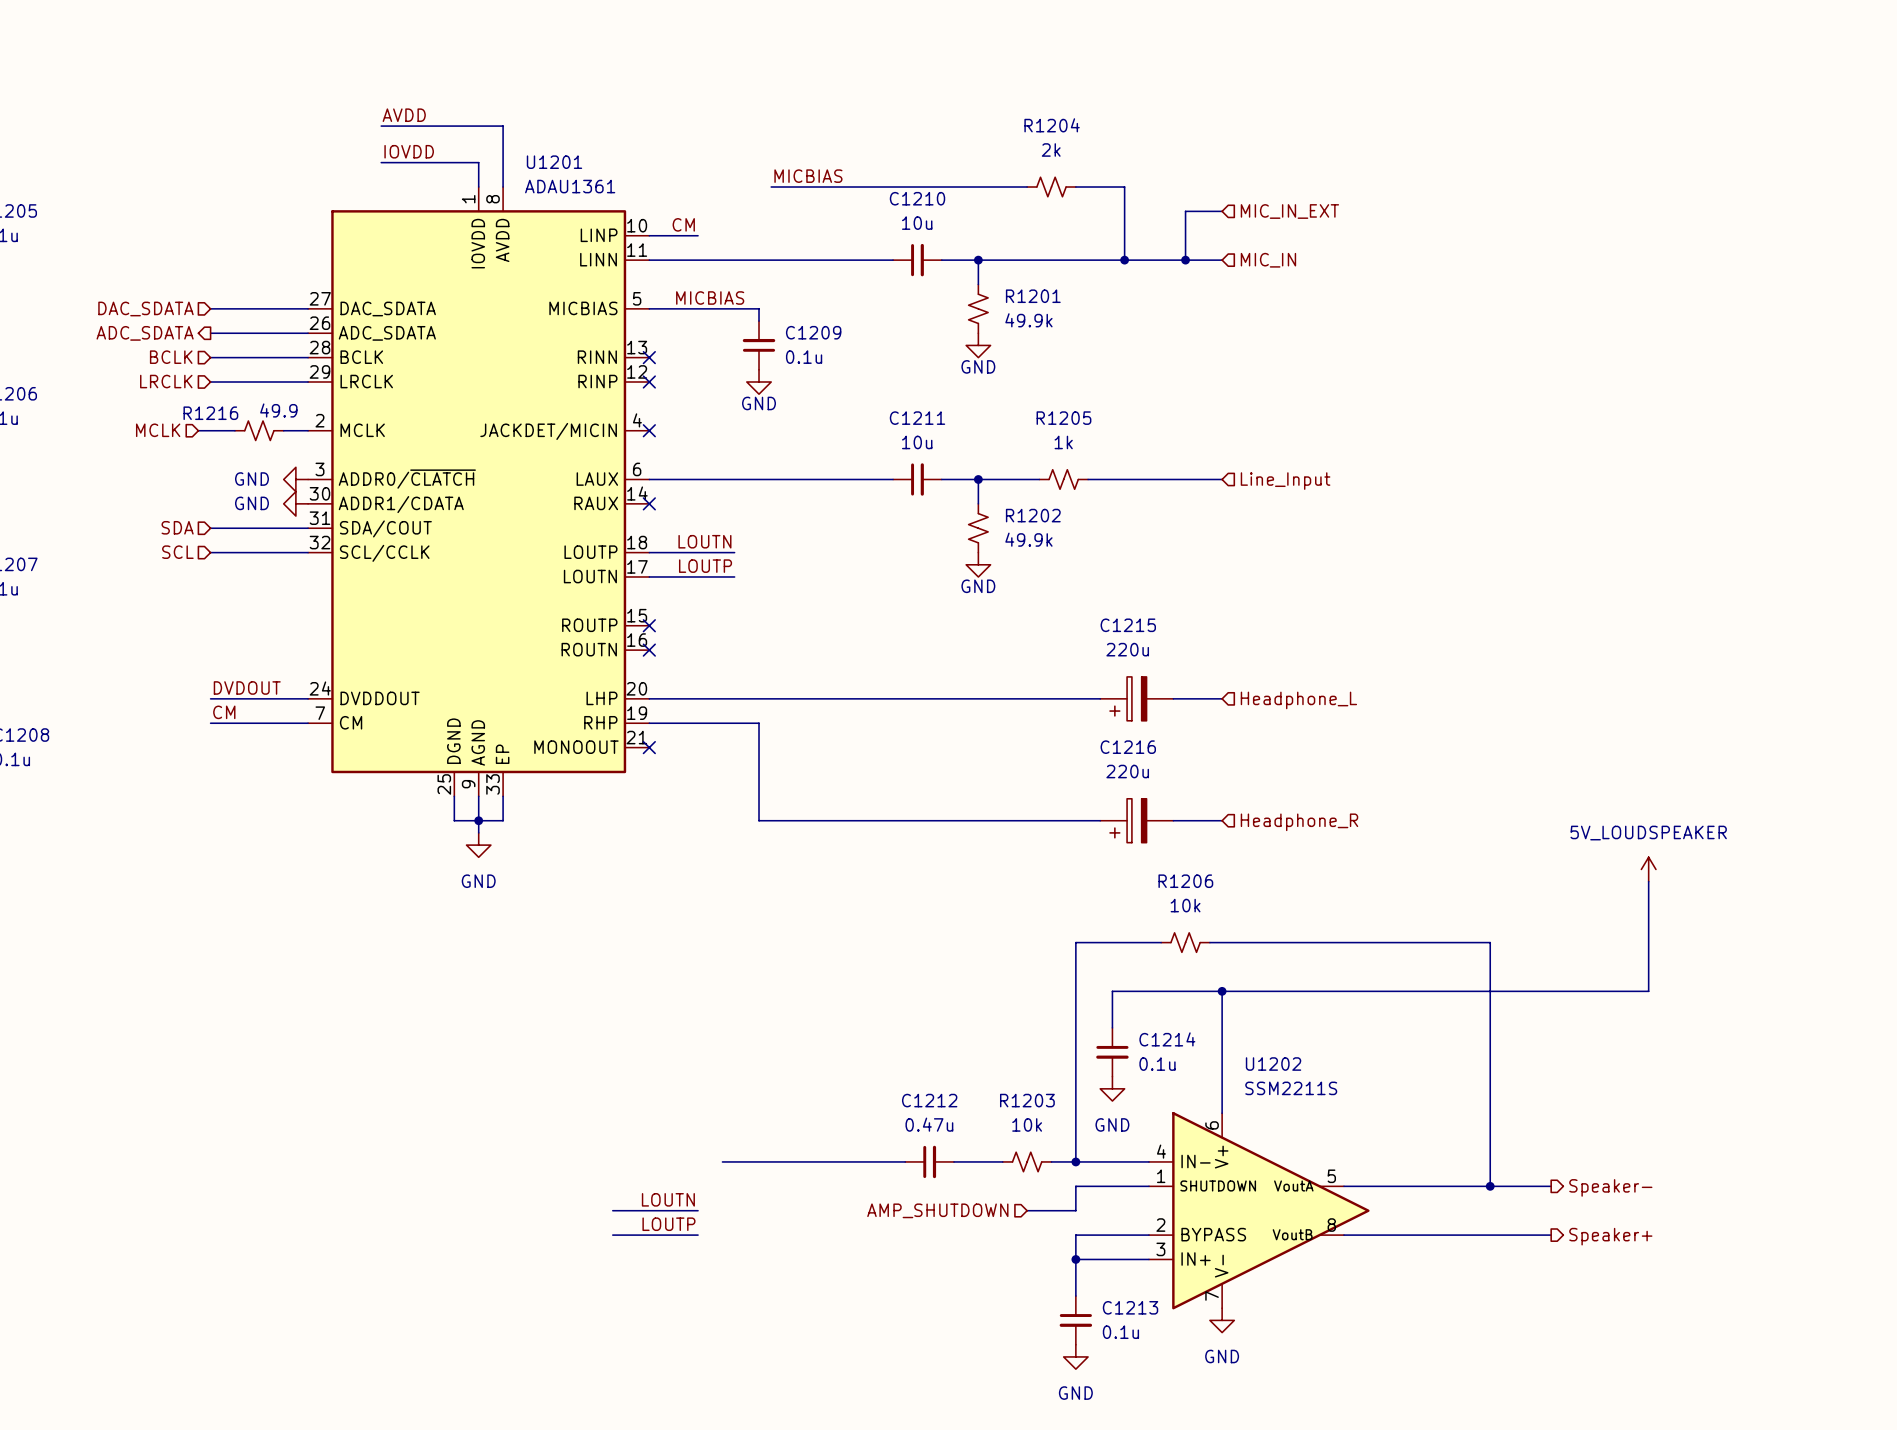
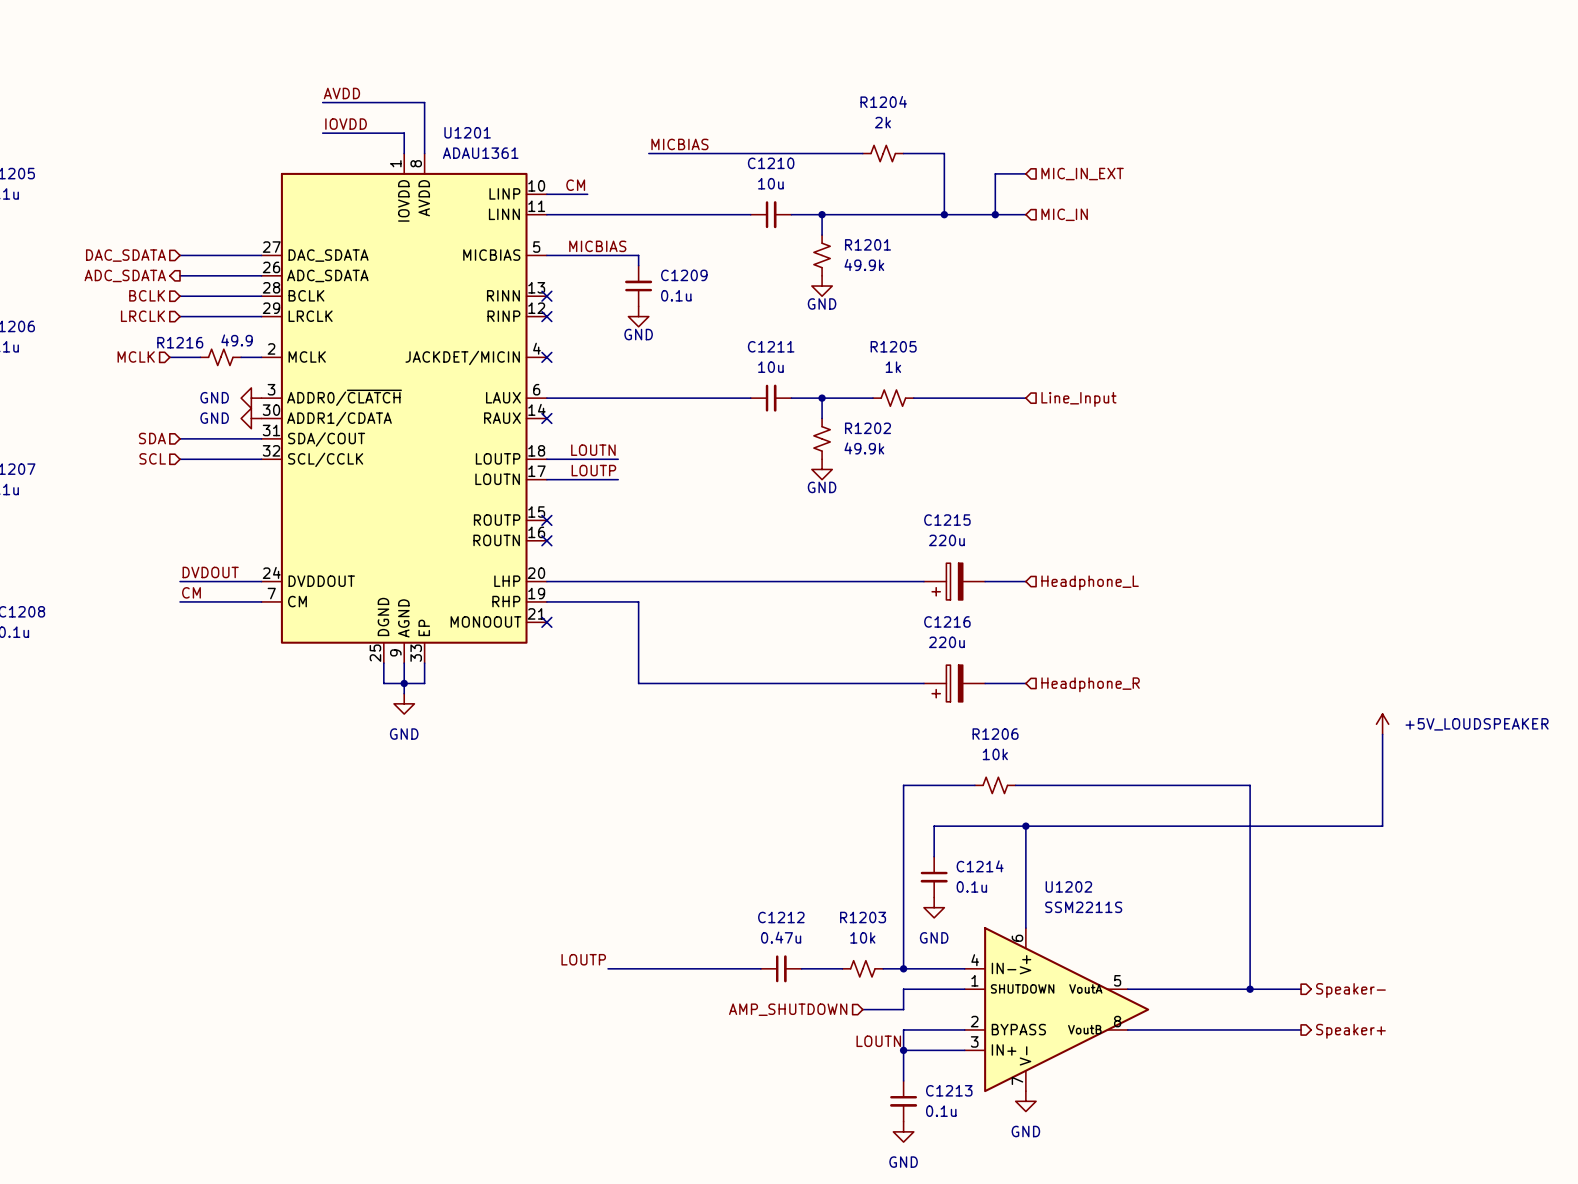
power symbol: 5V_LOUDSPEAKER (1648, 869) -> +5V_LOUDSPEAKER (1382, 724)
label: LOUTN (668, 1199) -> none
wire: (612, 1210) (698, 1210) -> none
label position: LOUTP (668, 1224) -> LOUTP (583, 959)
wire: (612, 1235) (698, 1235) -> none
label: none -> LOUTN (878, 1041)

